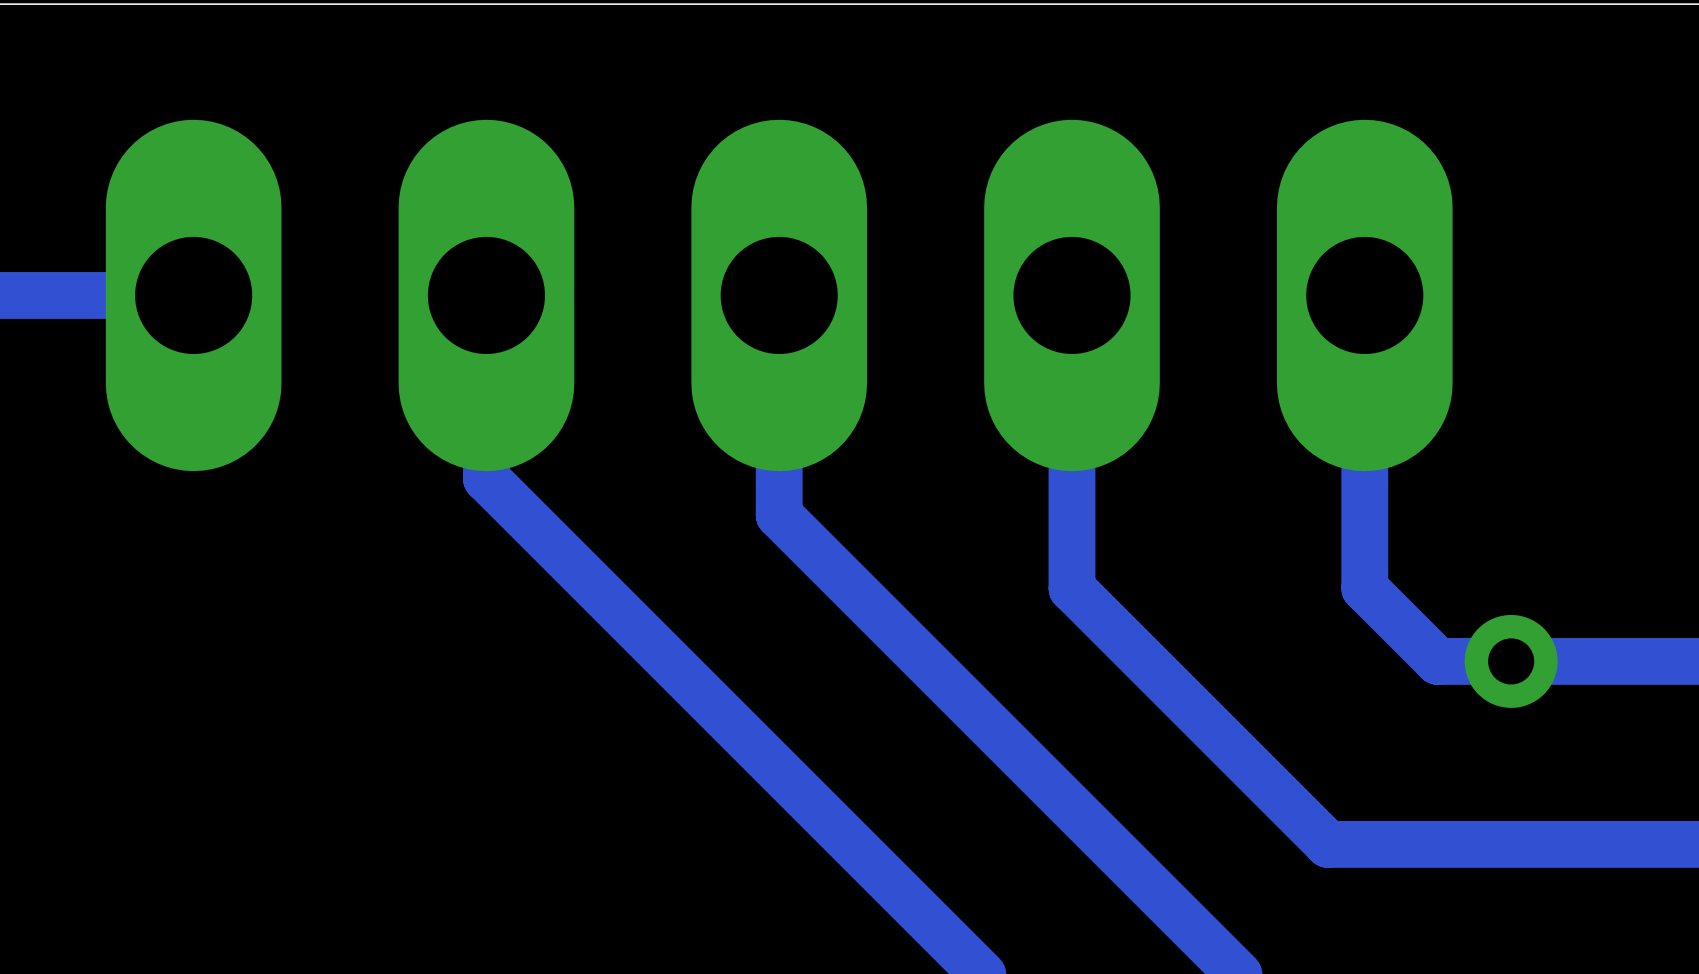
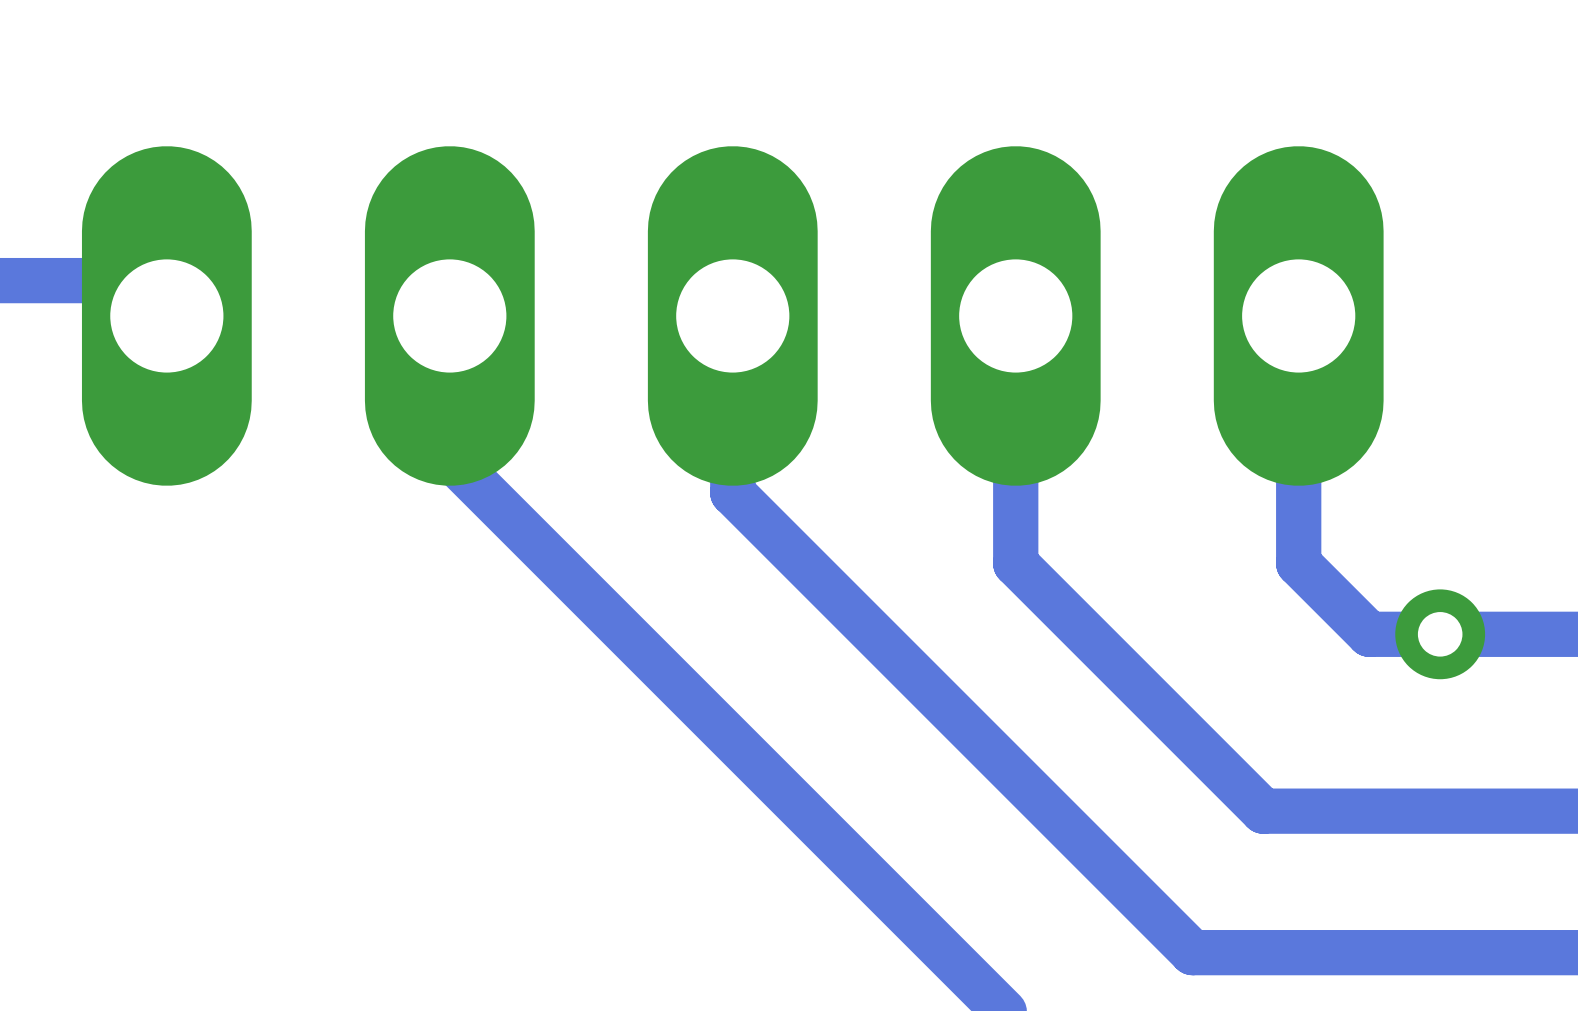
part position: (779, 295) -> (732, 315)

